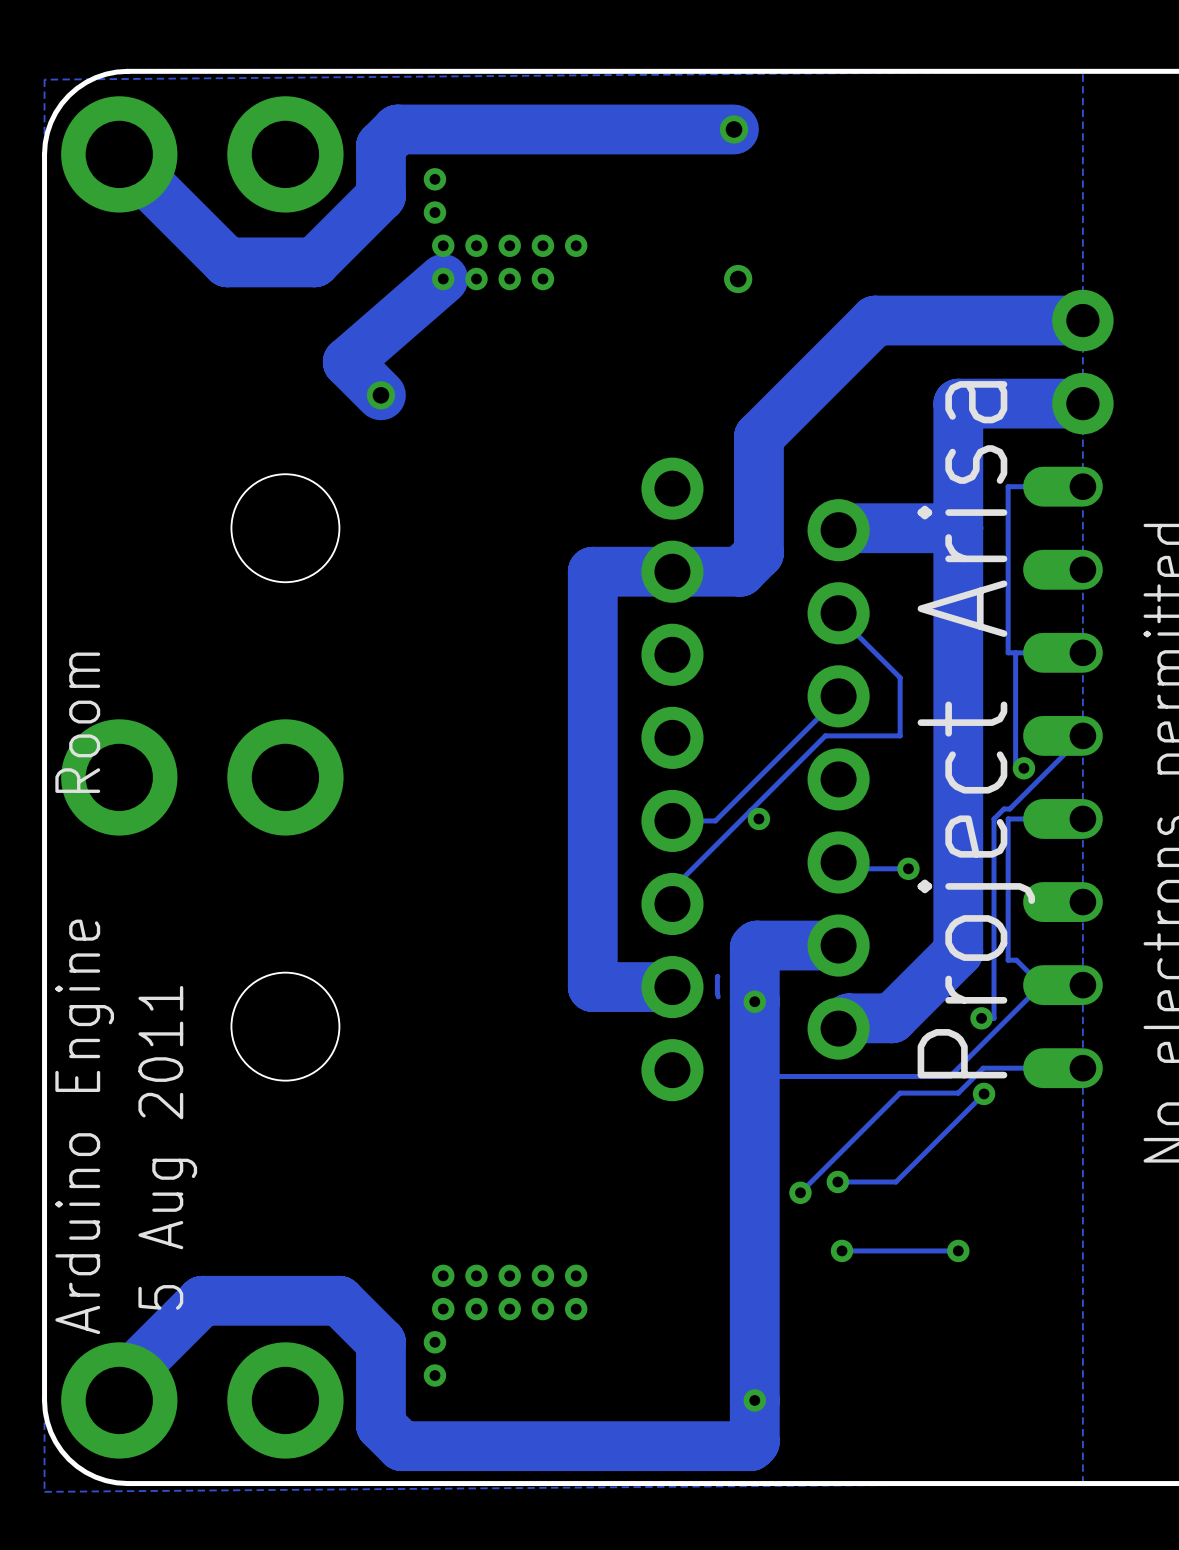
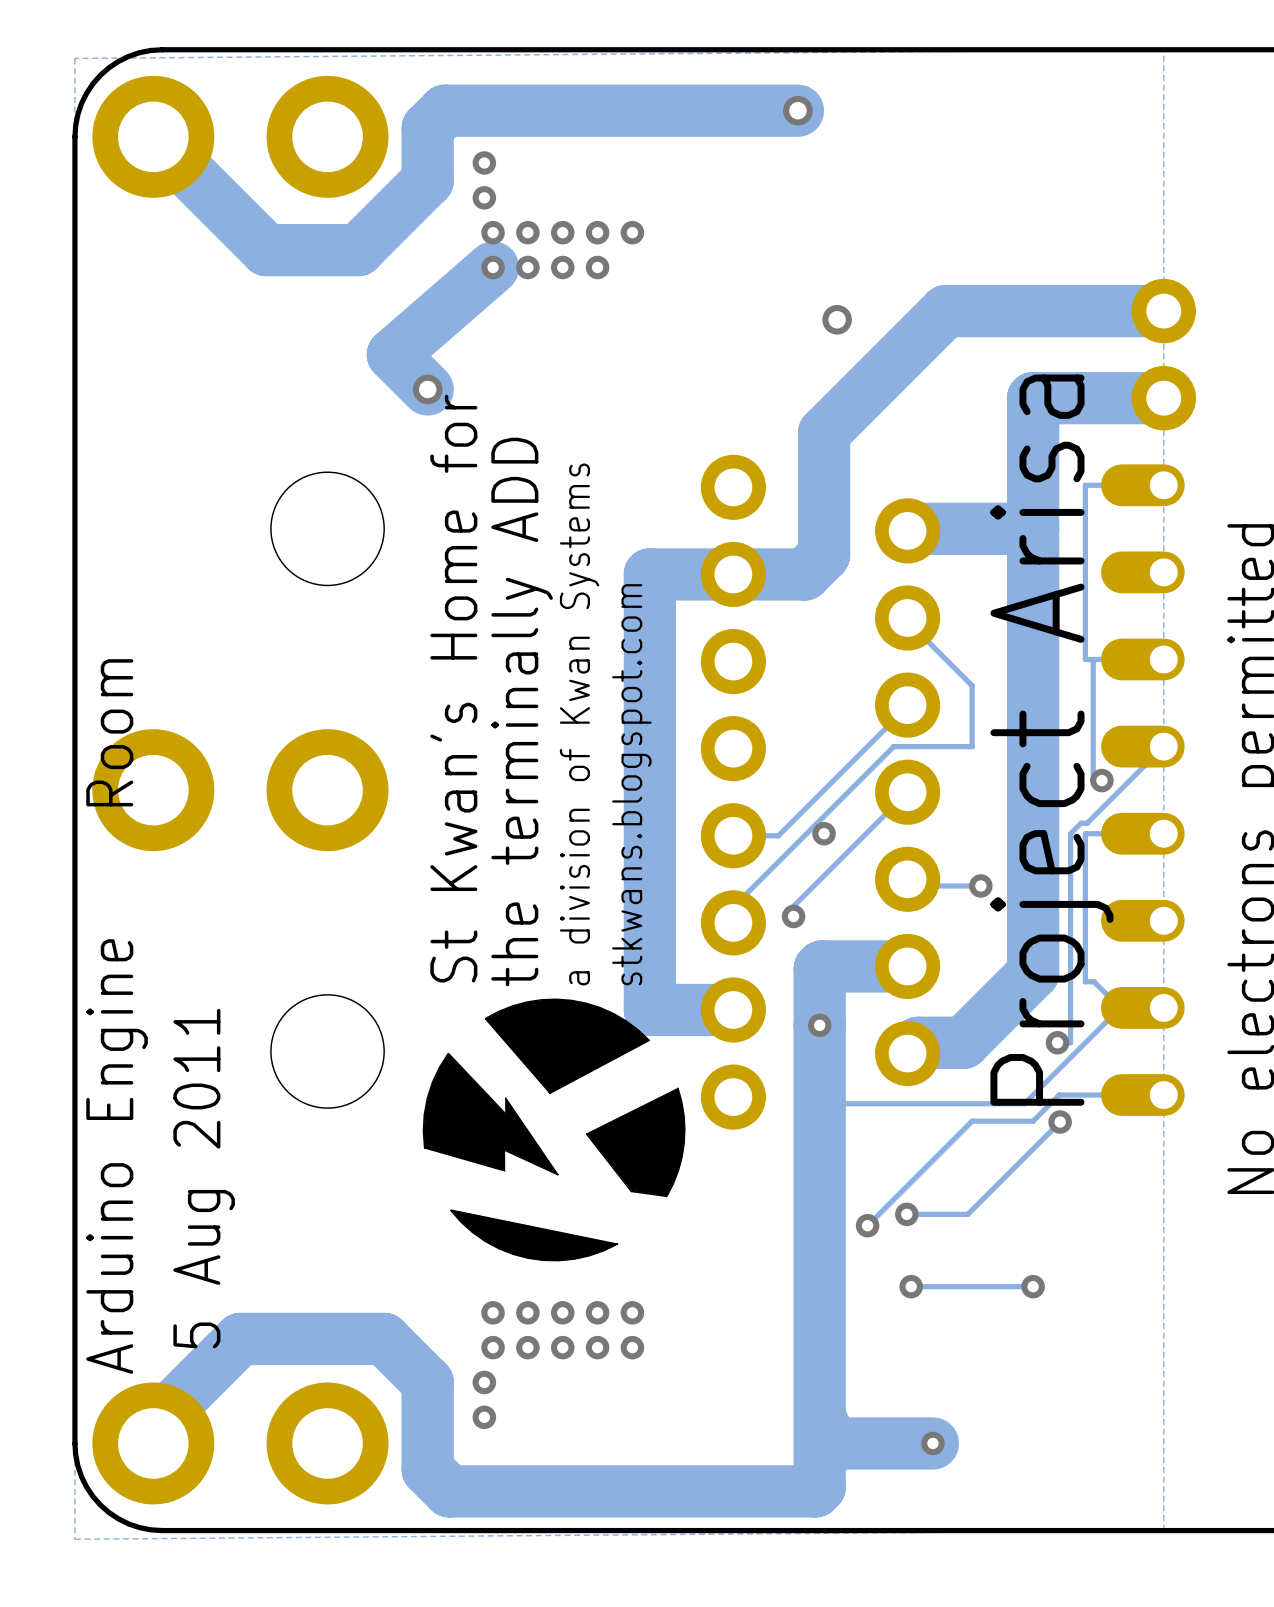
via position: (738, 279) -> (837, 319)
text: none -> St Kwan's Home for (453, 688)
text: none -> the terminally ADD (522, 711)
text: none -> a division of Kwan Systems (579, 724)
text: none -> stkwans.blogspot.com (631, 784)
track: none -> (907, 792) (793, 906) (793, 916)
via: none -> (793, 916)
drawing: none -> [422, 998, 686, 1262]
track: (717, 976) (718, 996) -> none
via position: (754, 1400) -> (932, 1443)
track: none -> (932, 1443) (824, 1443) (824, 1426) (829, 1438) (834, 1442) (839, 1443) (841, 1443)

